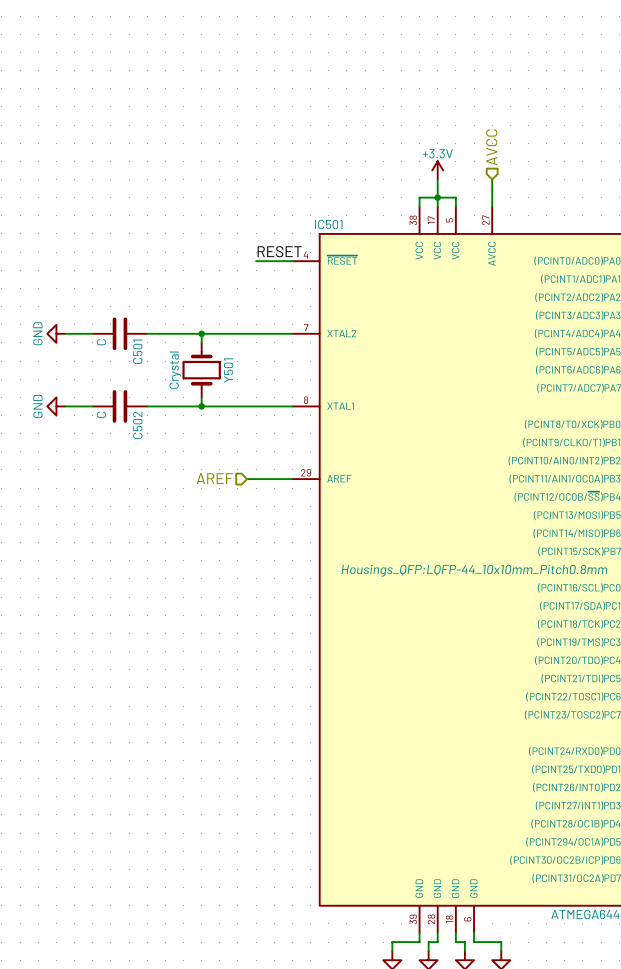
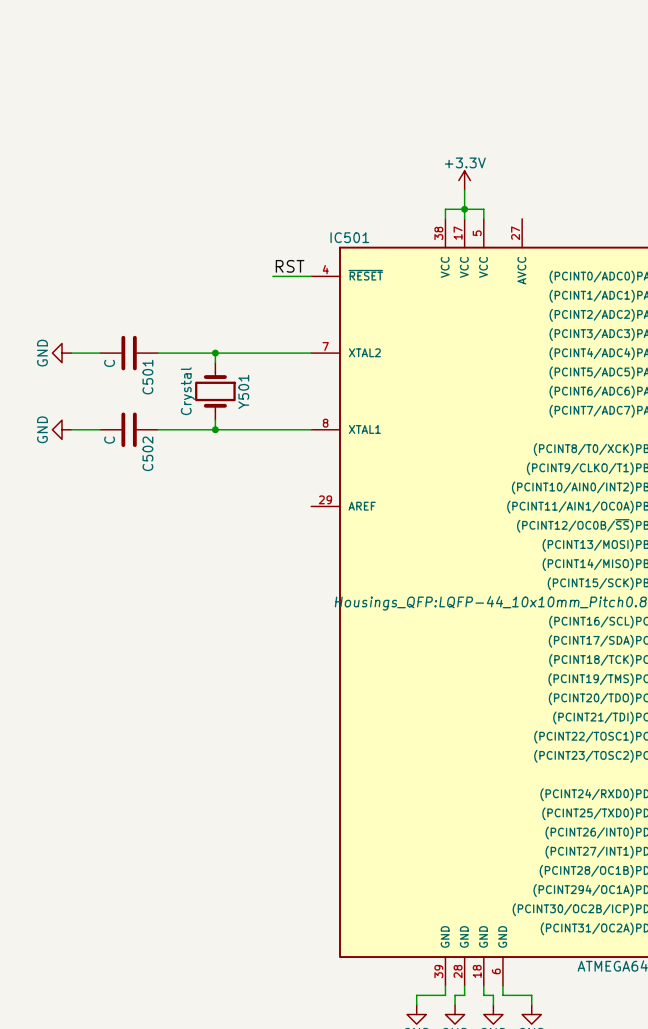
hierarchical label: AVCC (491, 147) -> none
wire: (492, 179) (492, 206) -> none
label: RESET (279, 251) -> RST (290, 266)
hierarchical label: AREF (214, 478) -> none
wire: (247, 479) (292, 479) -> none

